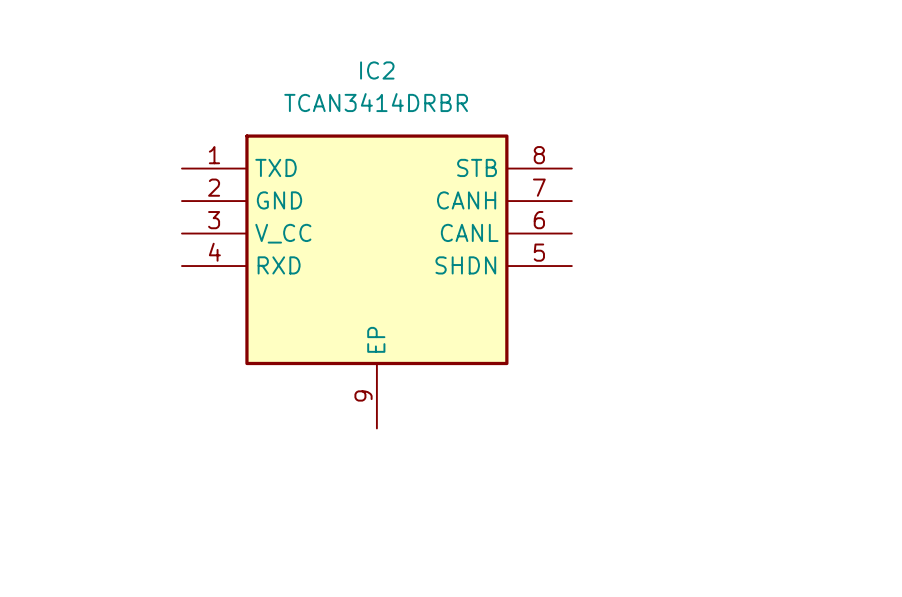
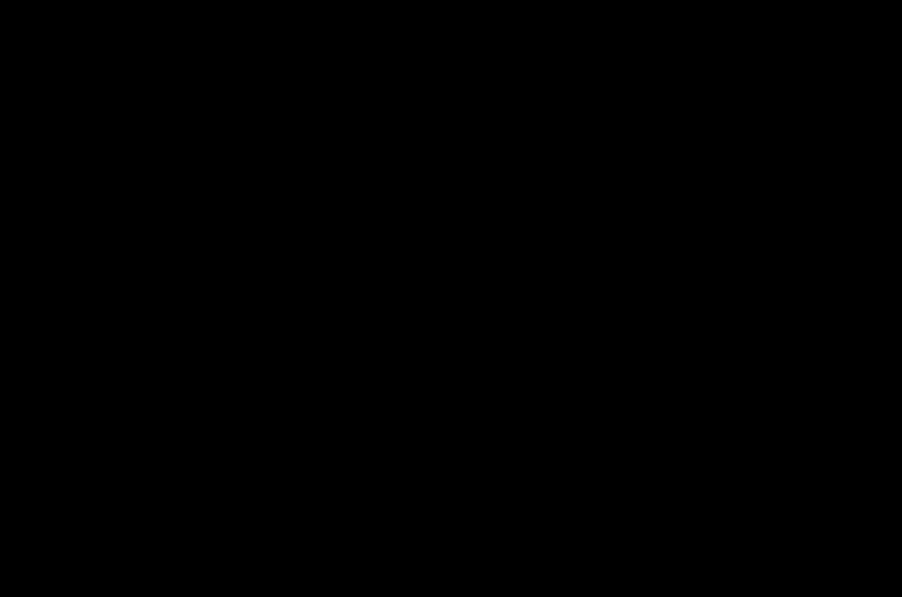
IC2: TCAN3414DRBR (376, 281) -> none

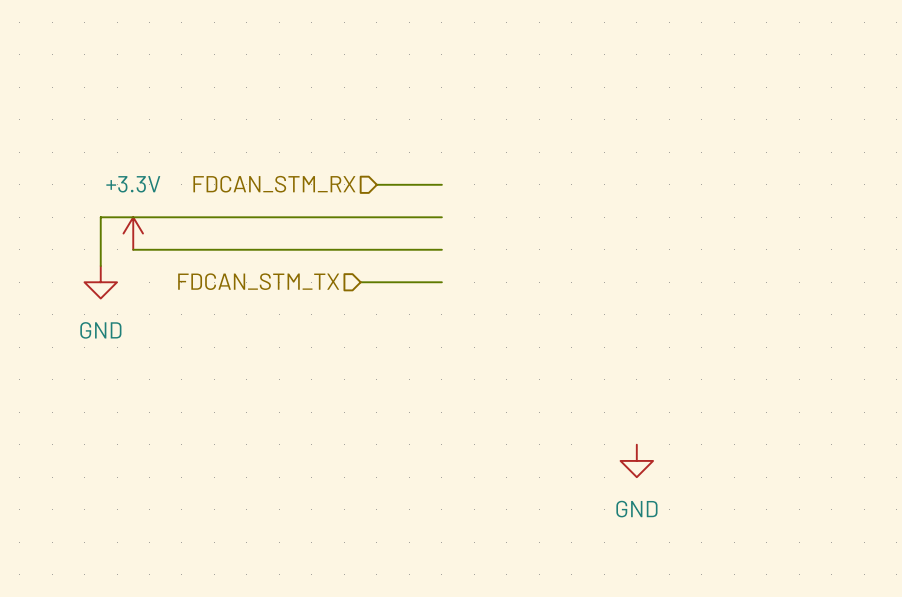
wire: none -> (376, 184) (441, 184)
hierarchical label: none -> FDCAN_STM_RX (274, 184)
wire: none -> (441, 217) (100, 217) (100, 266)
power symbol: none -> +3.3V (133, 233)
wire: none -> (133, 249) (441, 249)
power symbol: none -> GND (100, 282)
wire: none -> (360, 282) (441, 282)
hierarchical label: none -> FDCAN_STM_TX (258, 281)
power symbol: none -> GND (636, 460)

